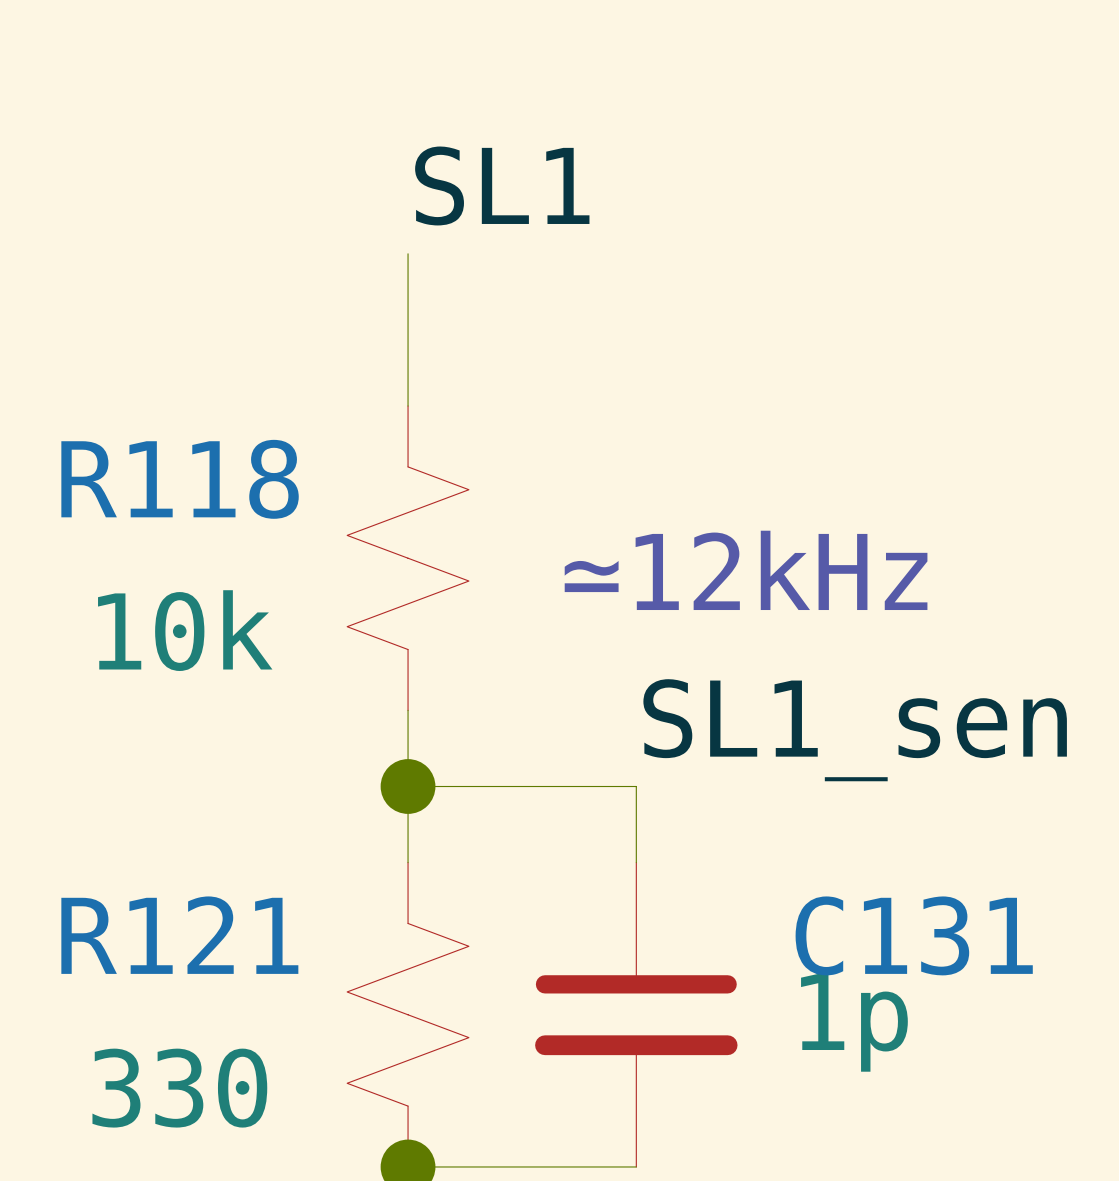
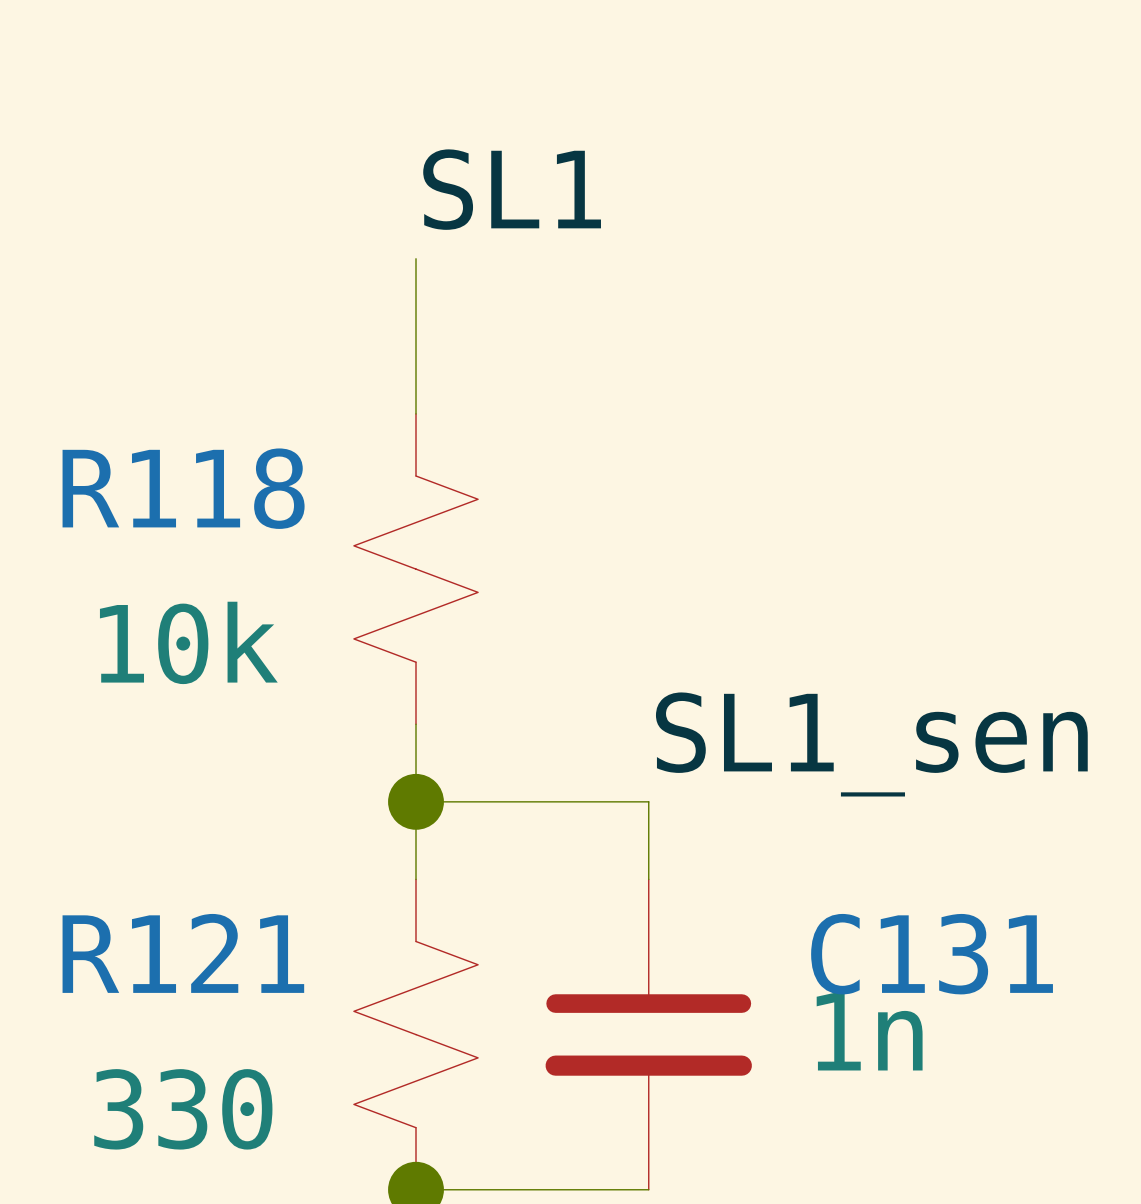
text: ≃12kHz (746, 570) -> none
C131 value: 1p (854, 1022) -> 1n (869, 1031)

